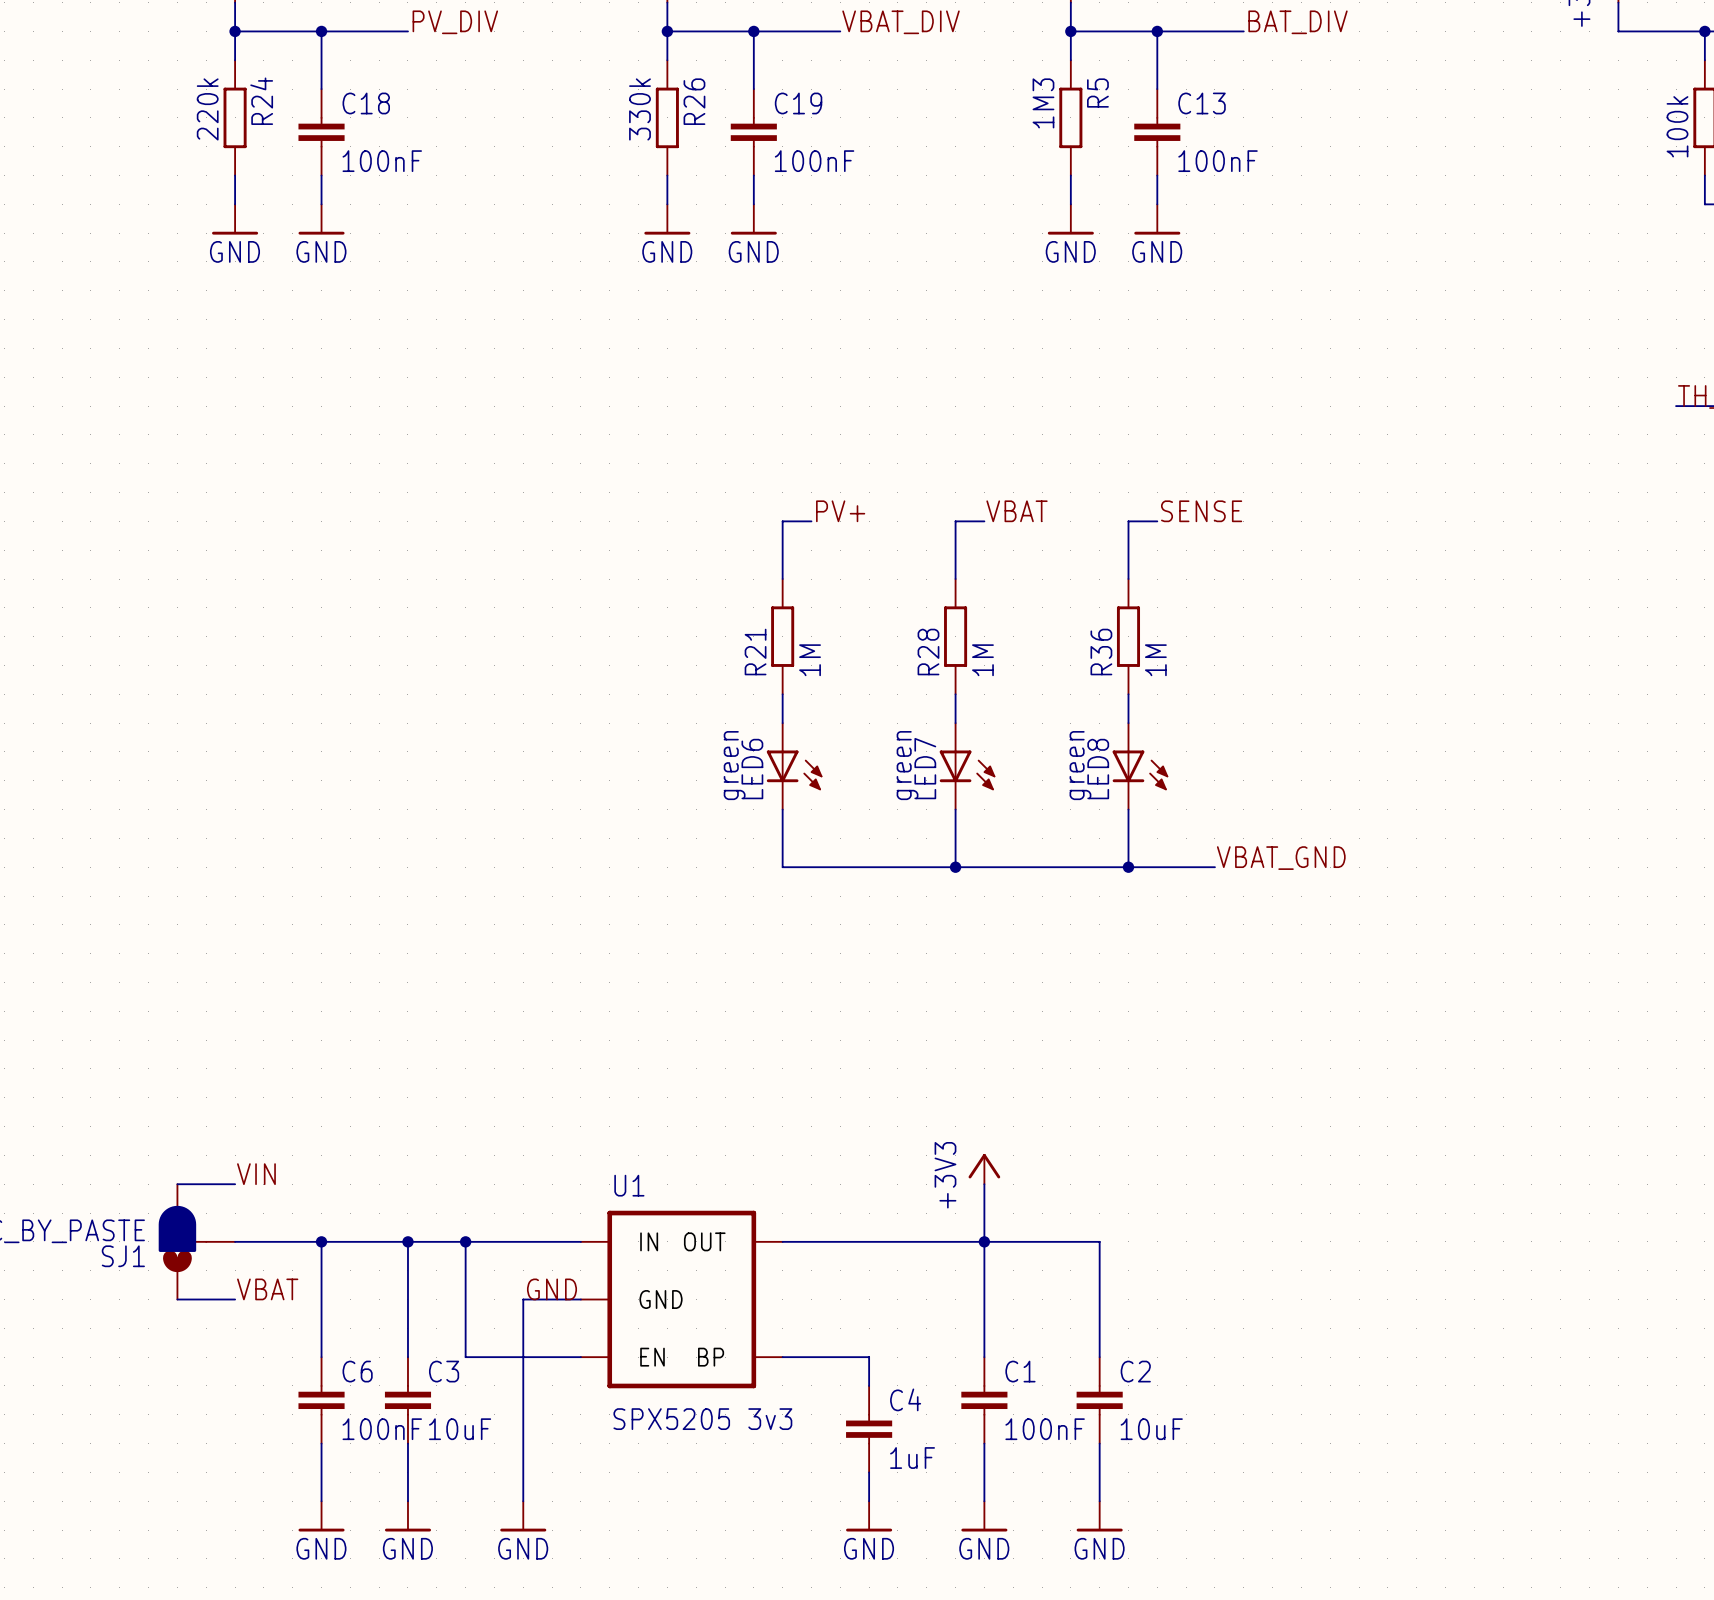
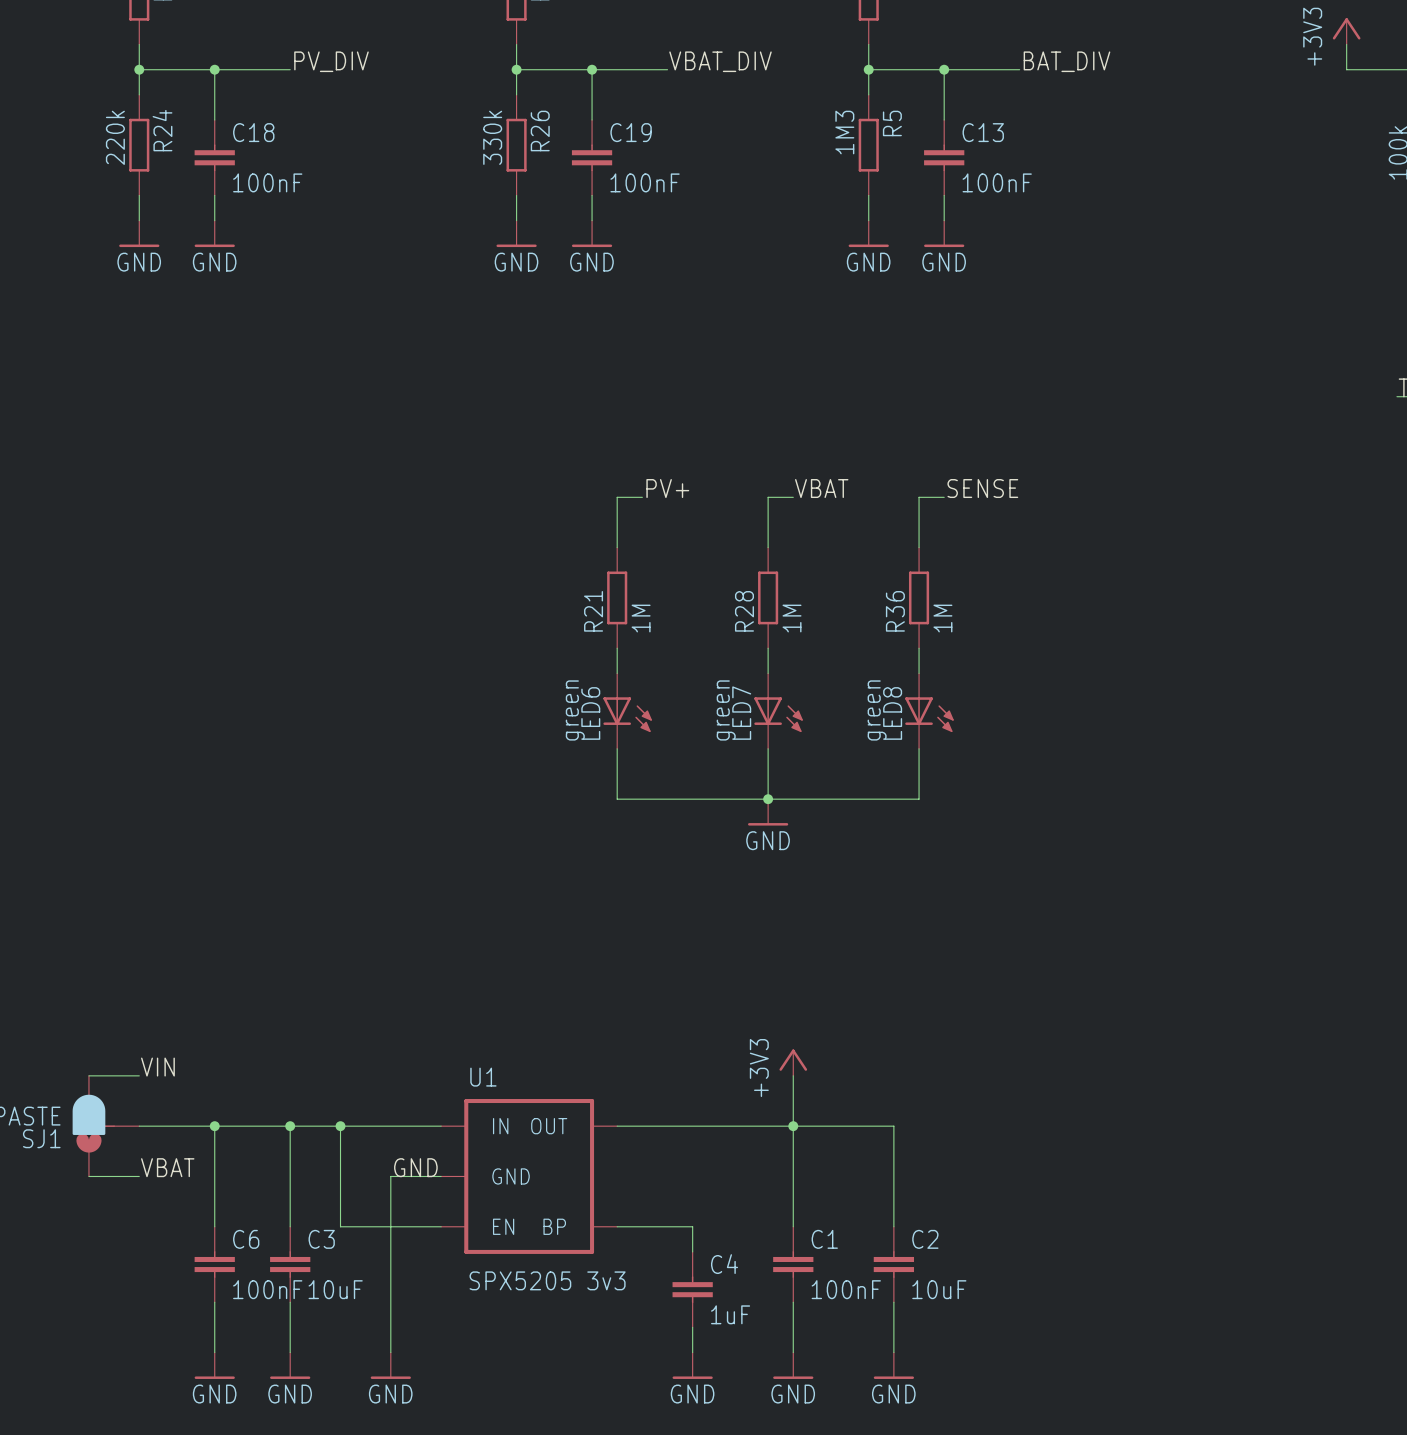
label: VBAT_GND (1281, 858) -> none
wire: (1128, 867) (1214, 867) -> none
junction: (1128, 867) -> none
power symbol: none -> GND (768, 812)

